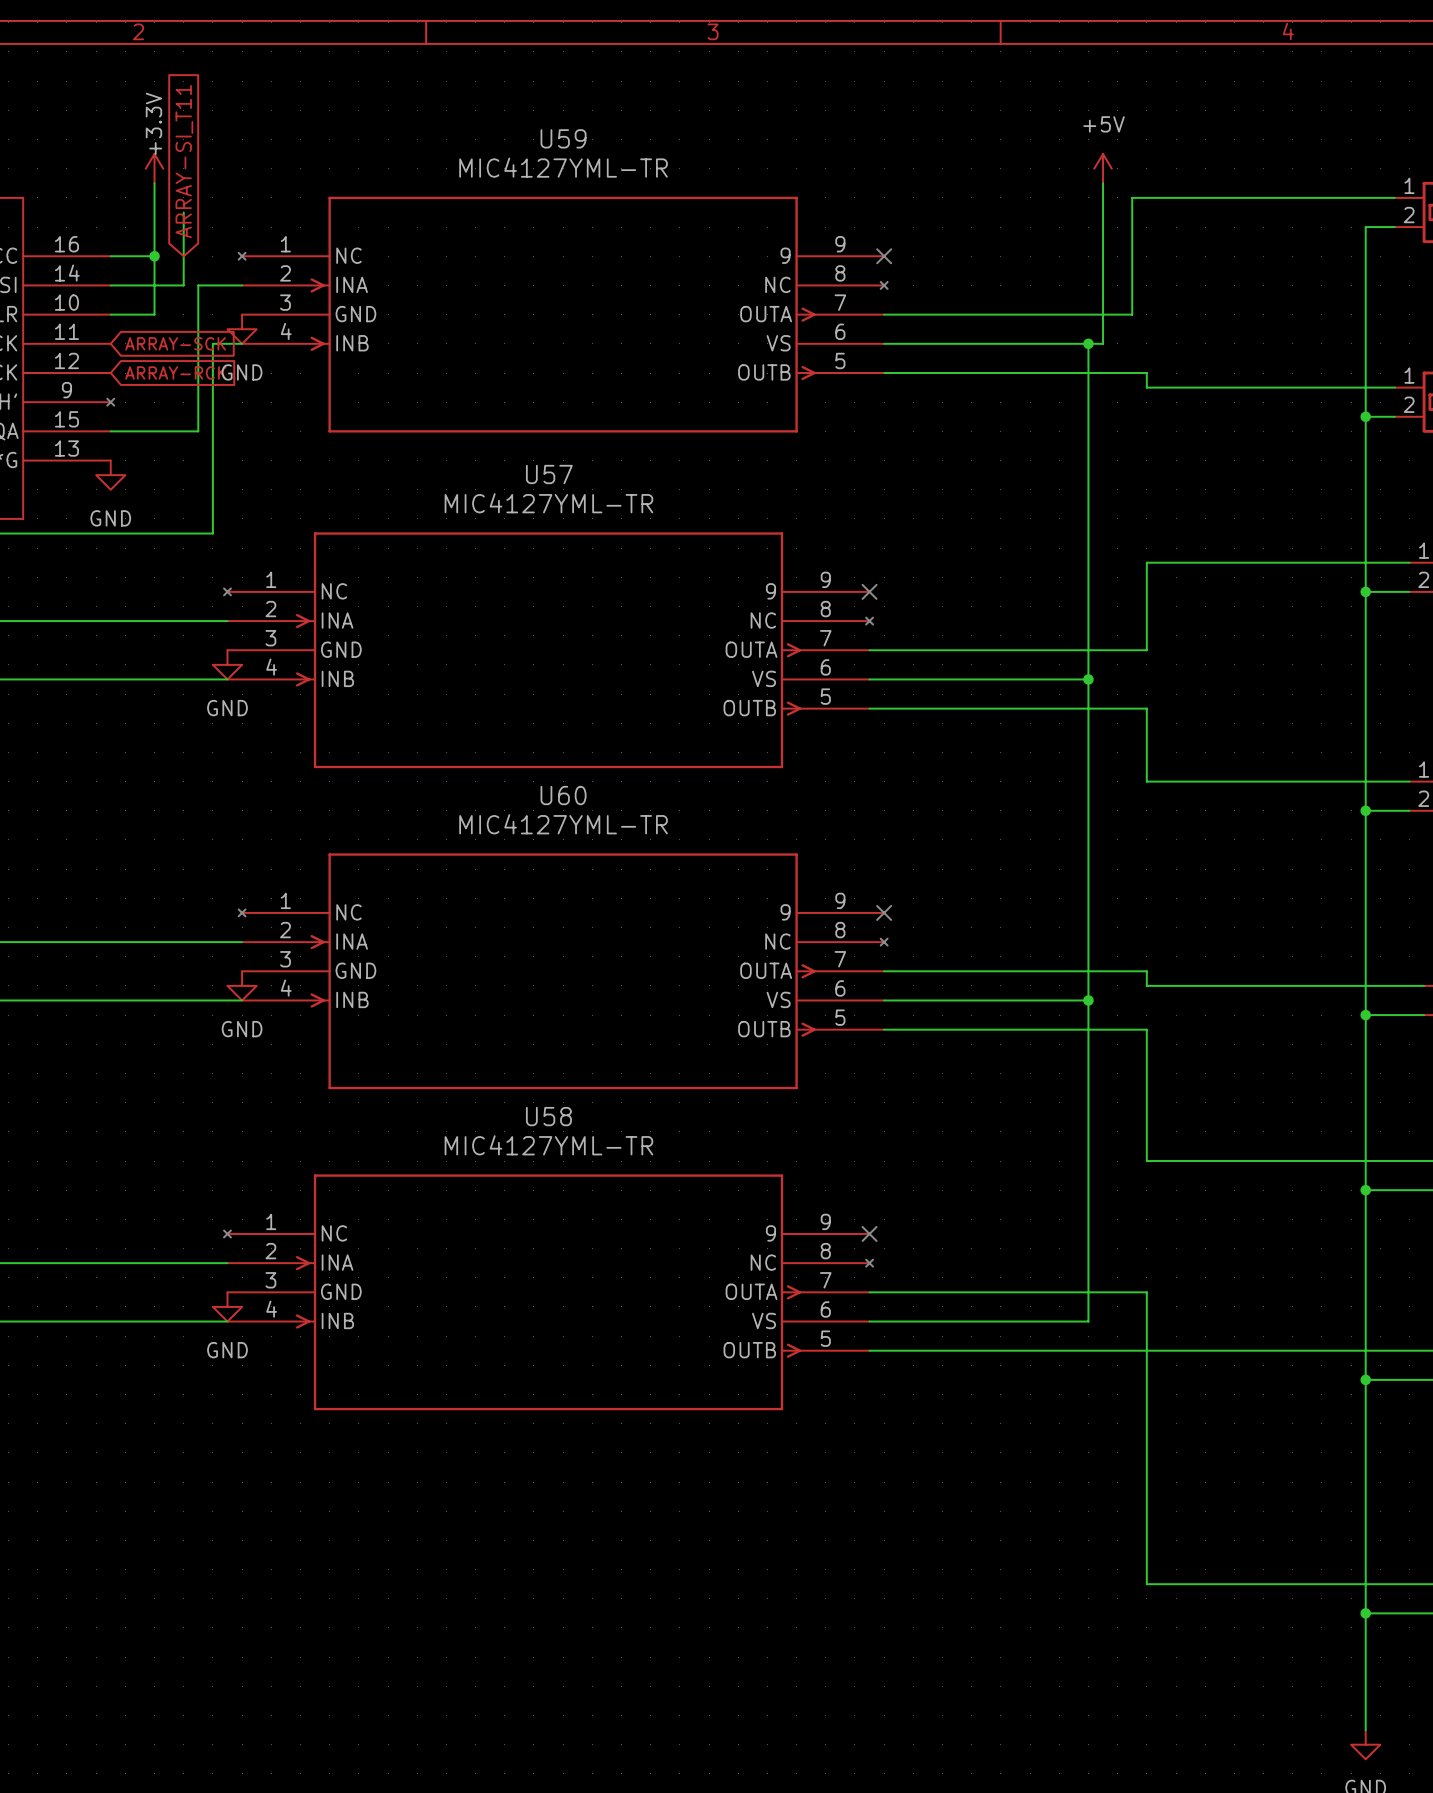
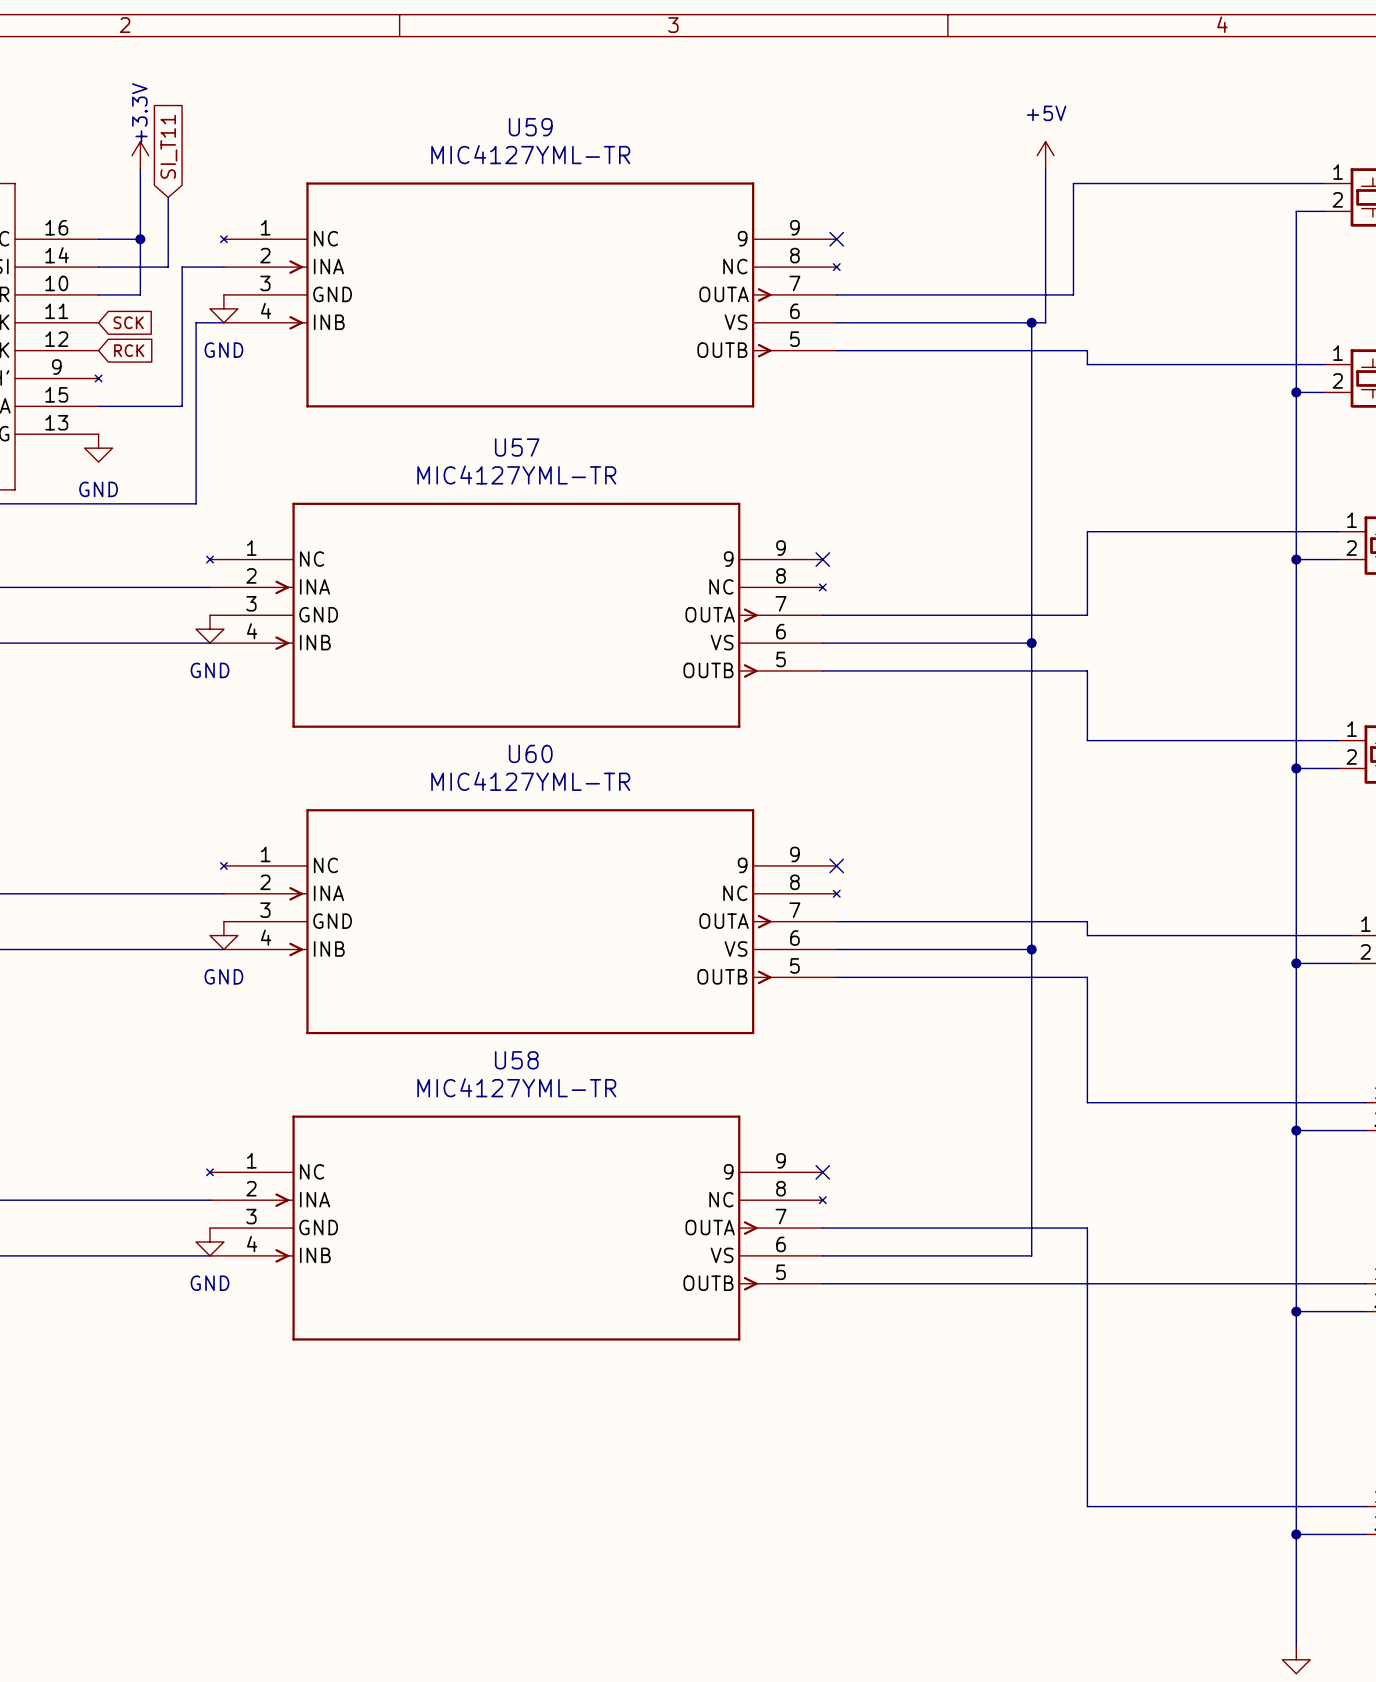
global label: ARRAY-SI_T11 (184, 161) -> SI_T11 (168, 146)
global label: ARRAY-SCK (175, 343) -> SCK (128, 322)
global label: ARRAY-RCK (175, 373) -> RCK (129, 350)

